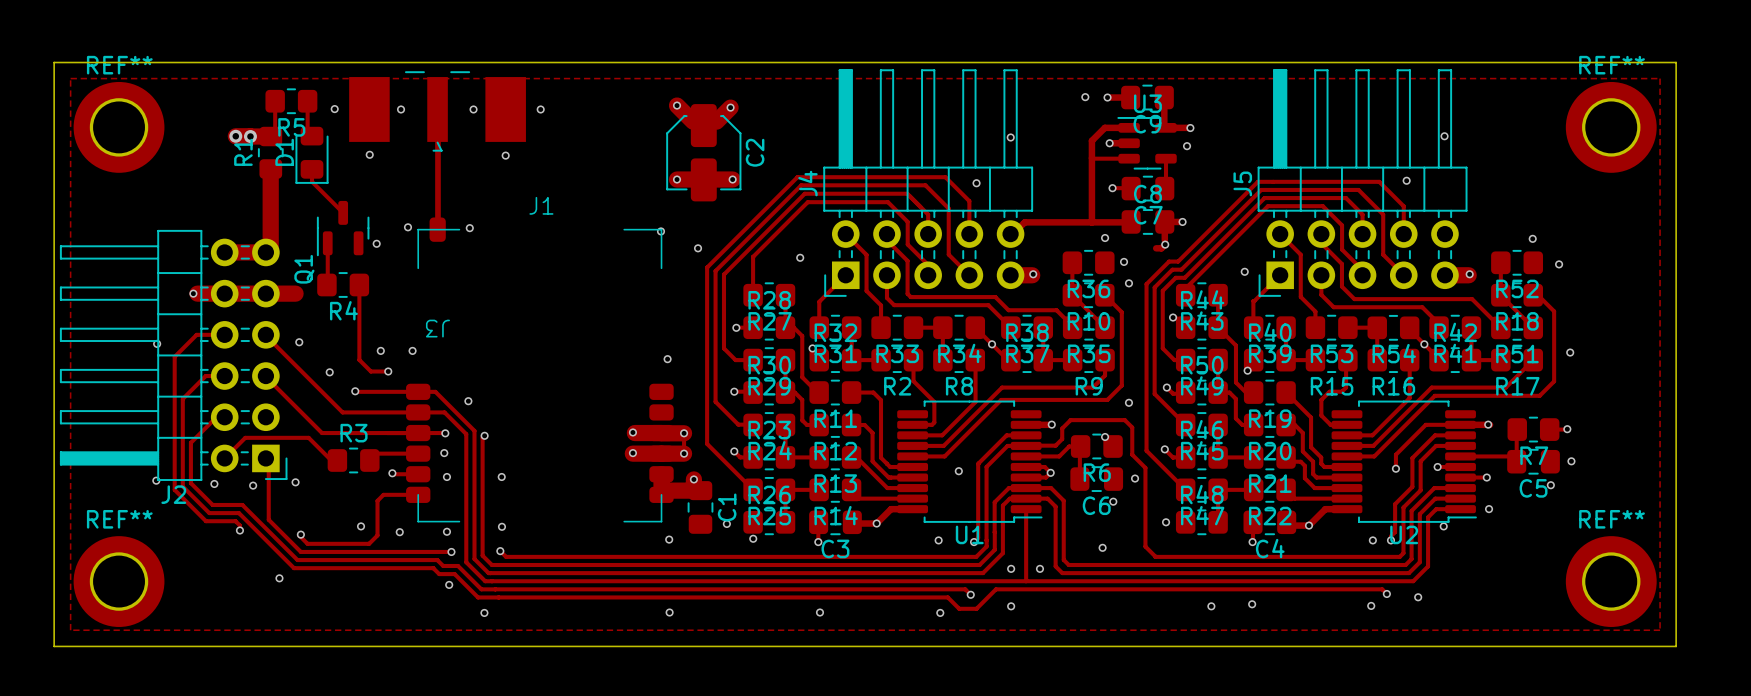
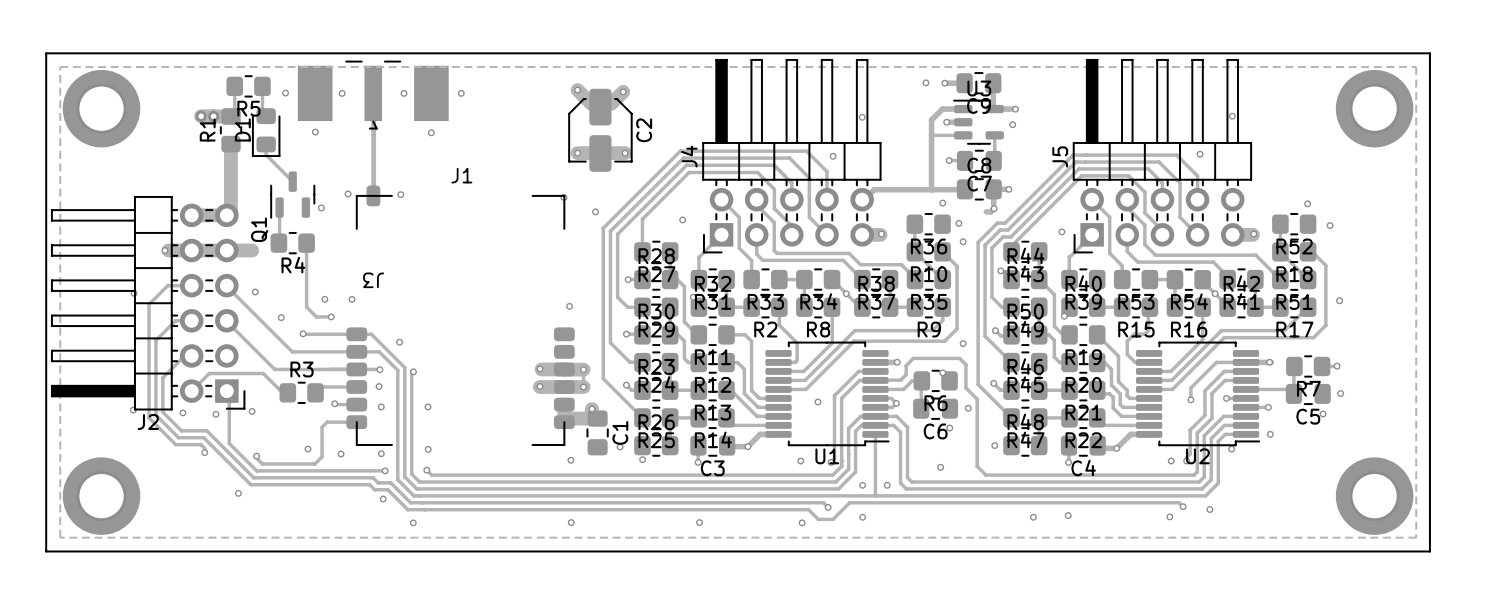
REF** name: REF** (119, 65) -> none
REF** name: REF** (1612, 65) -> none
REF** name: REF** (119, 519) -> none
REF** name: REF** (1612, 519) -> none

